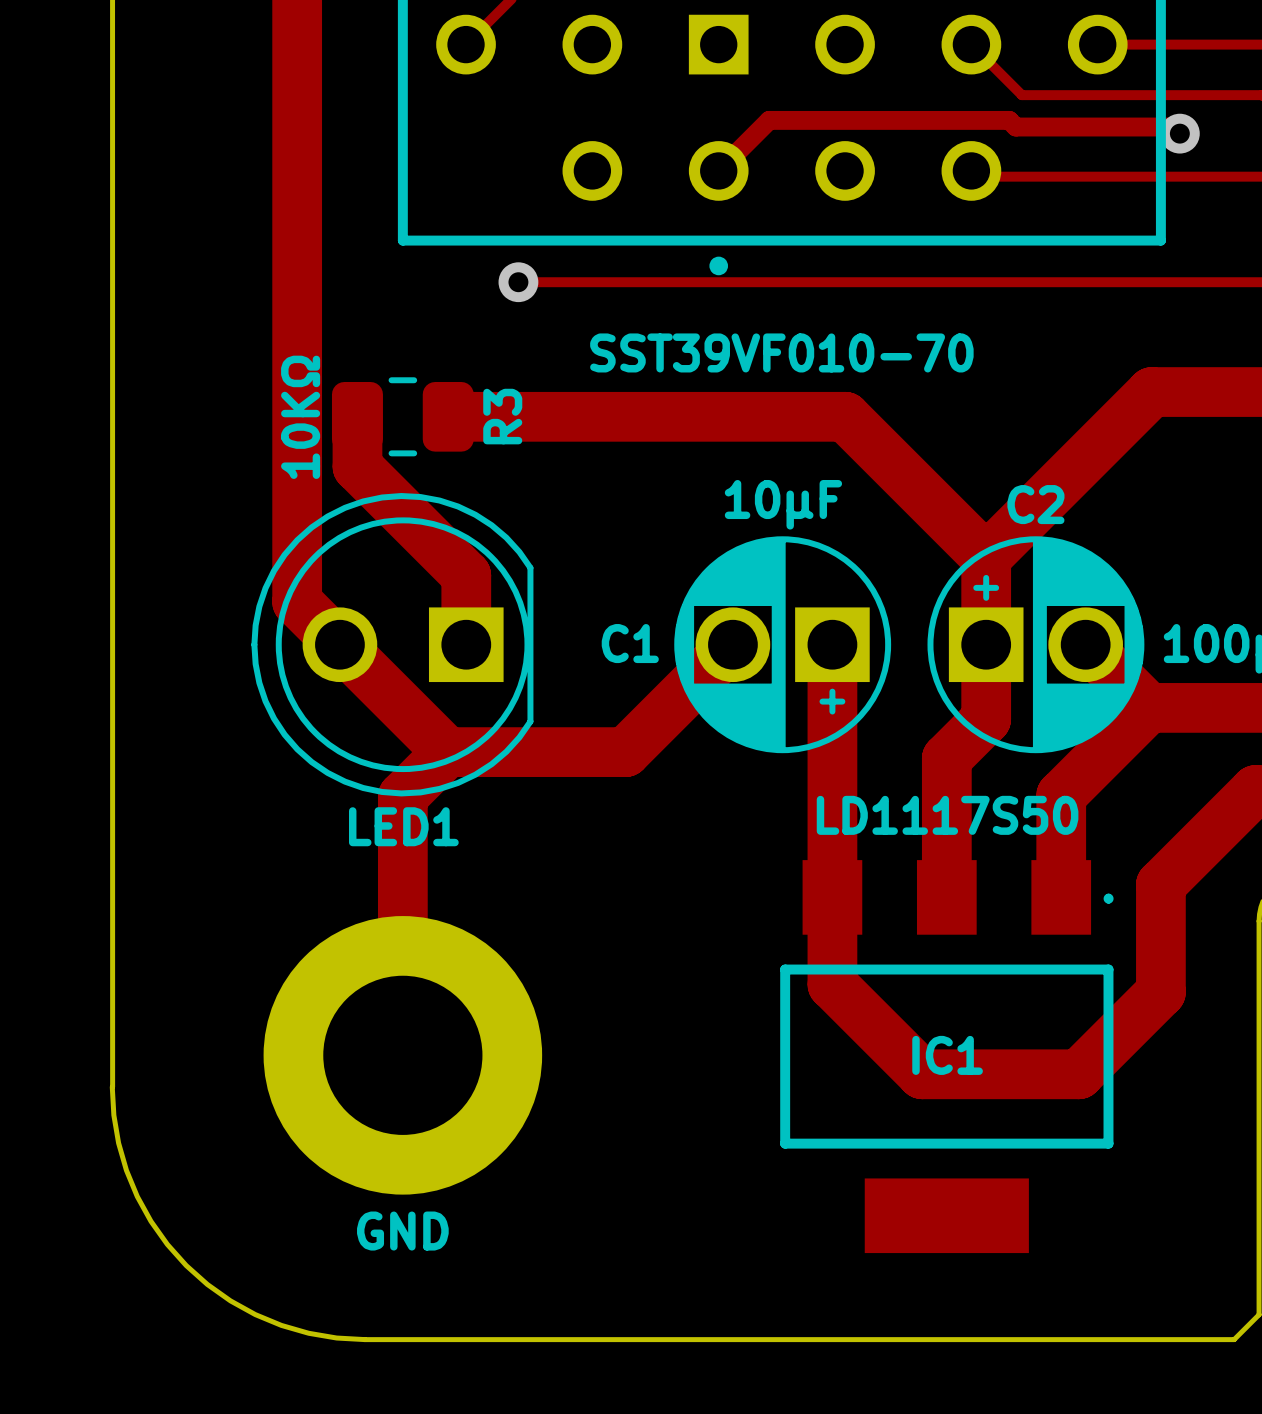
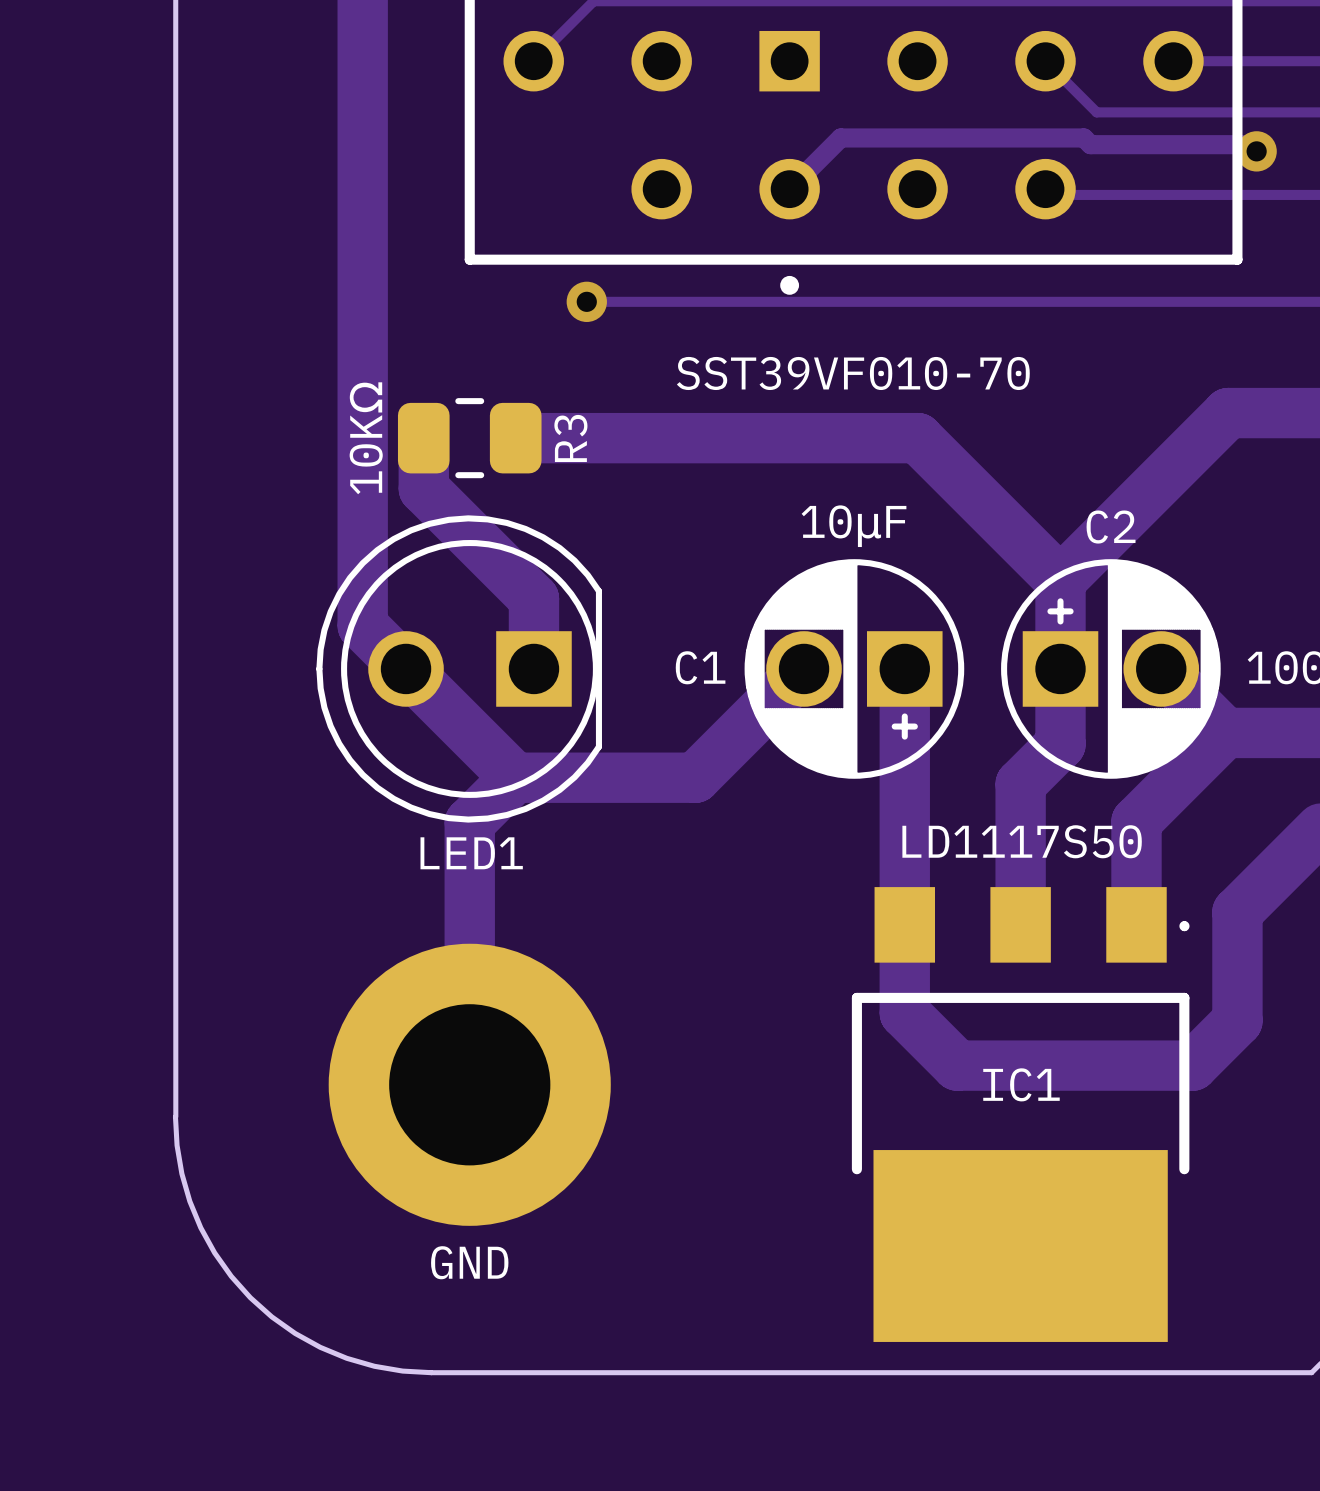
IC1 footprint: [780, 860, 1114, 1254] -> [851, 887, 1190, 1342]
track: (884, 1036) (922, 1074) (1078, 1074) (1116, 1036) -> (957, 1065) (1192, 1065)

